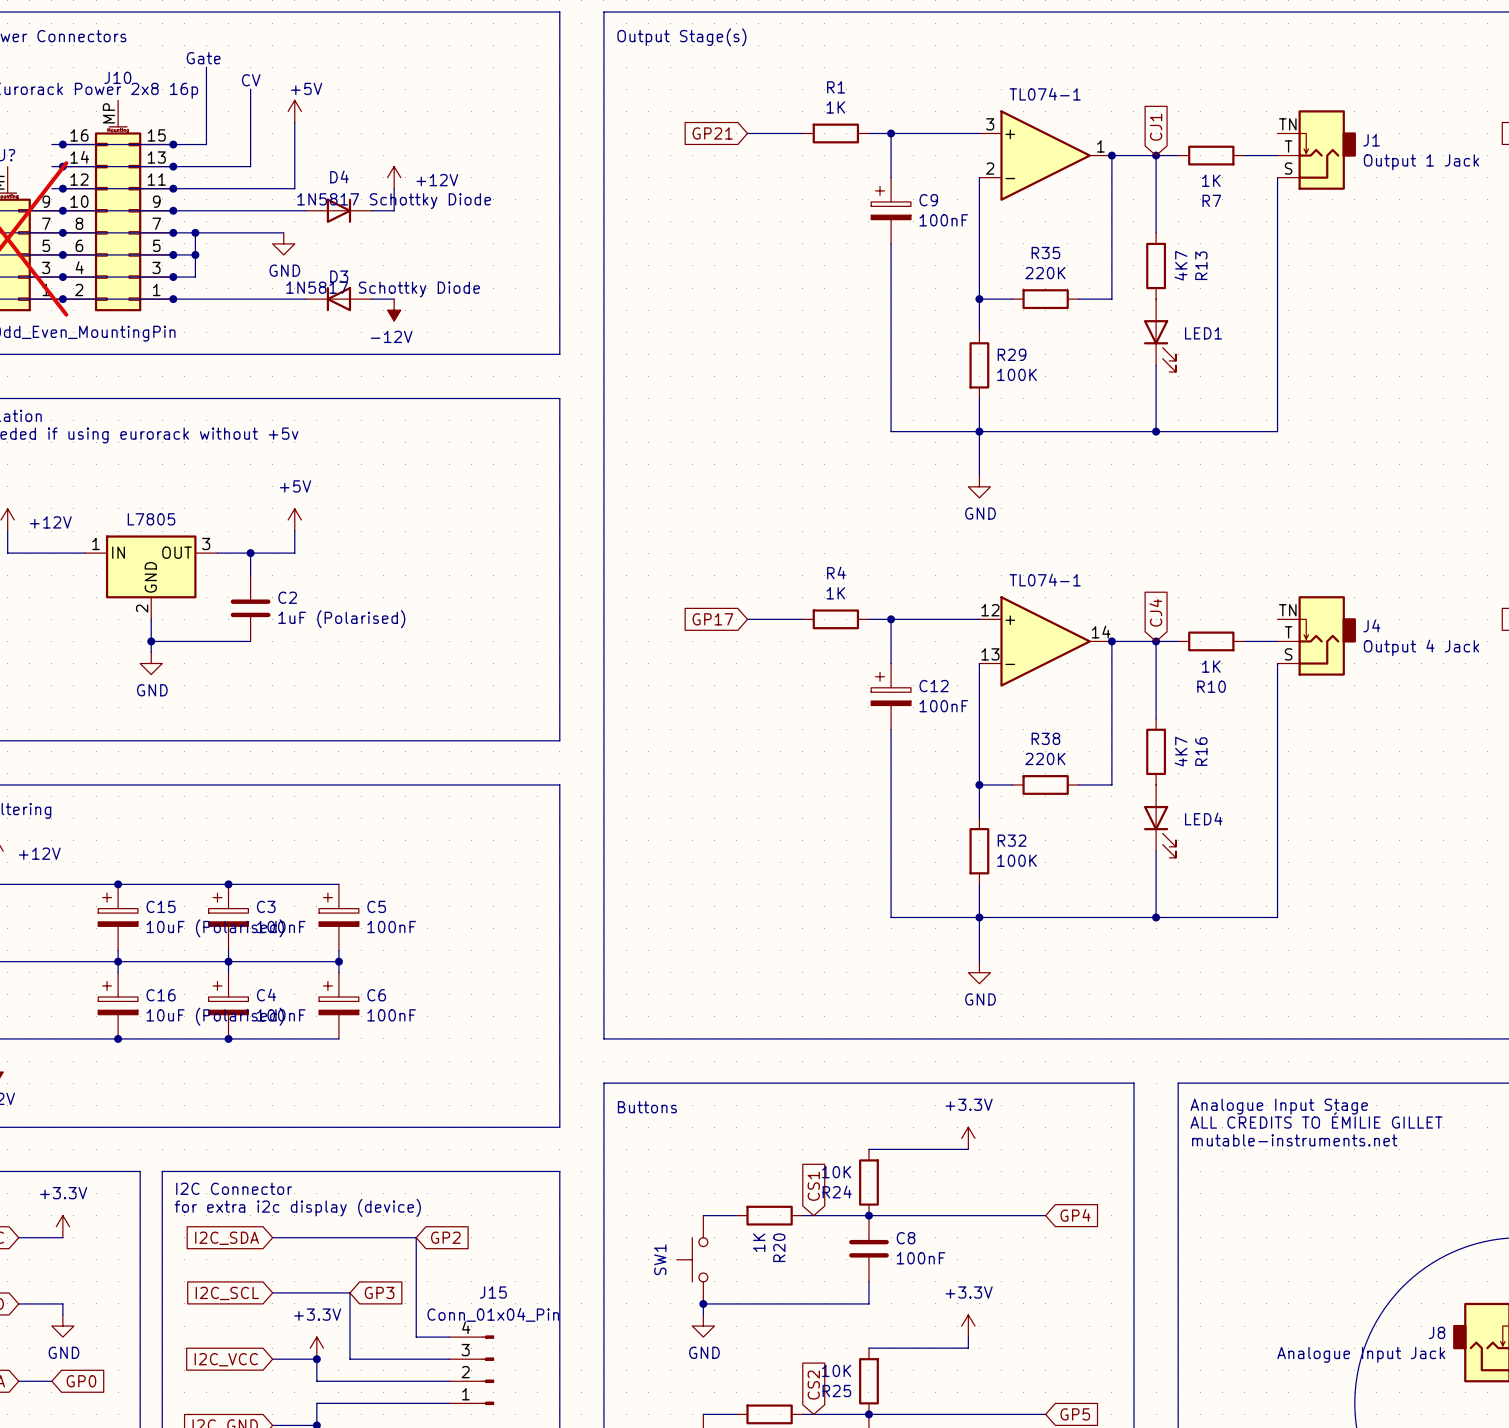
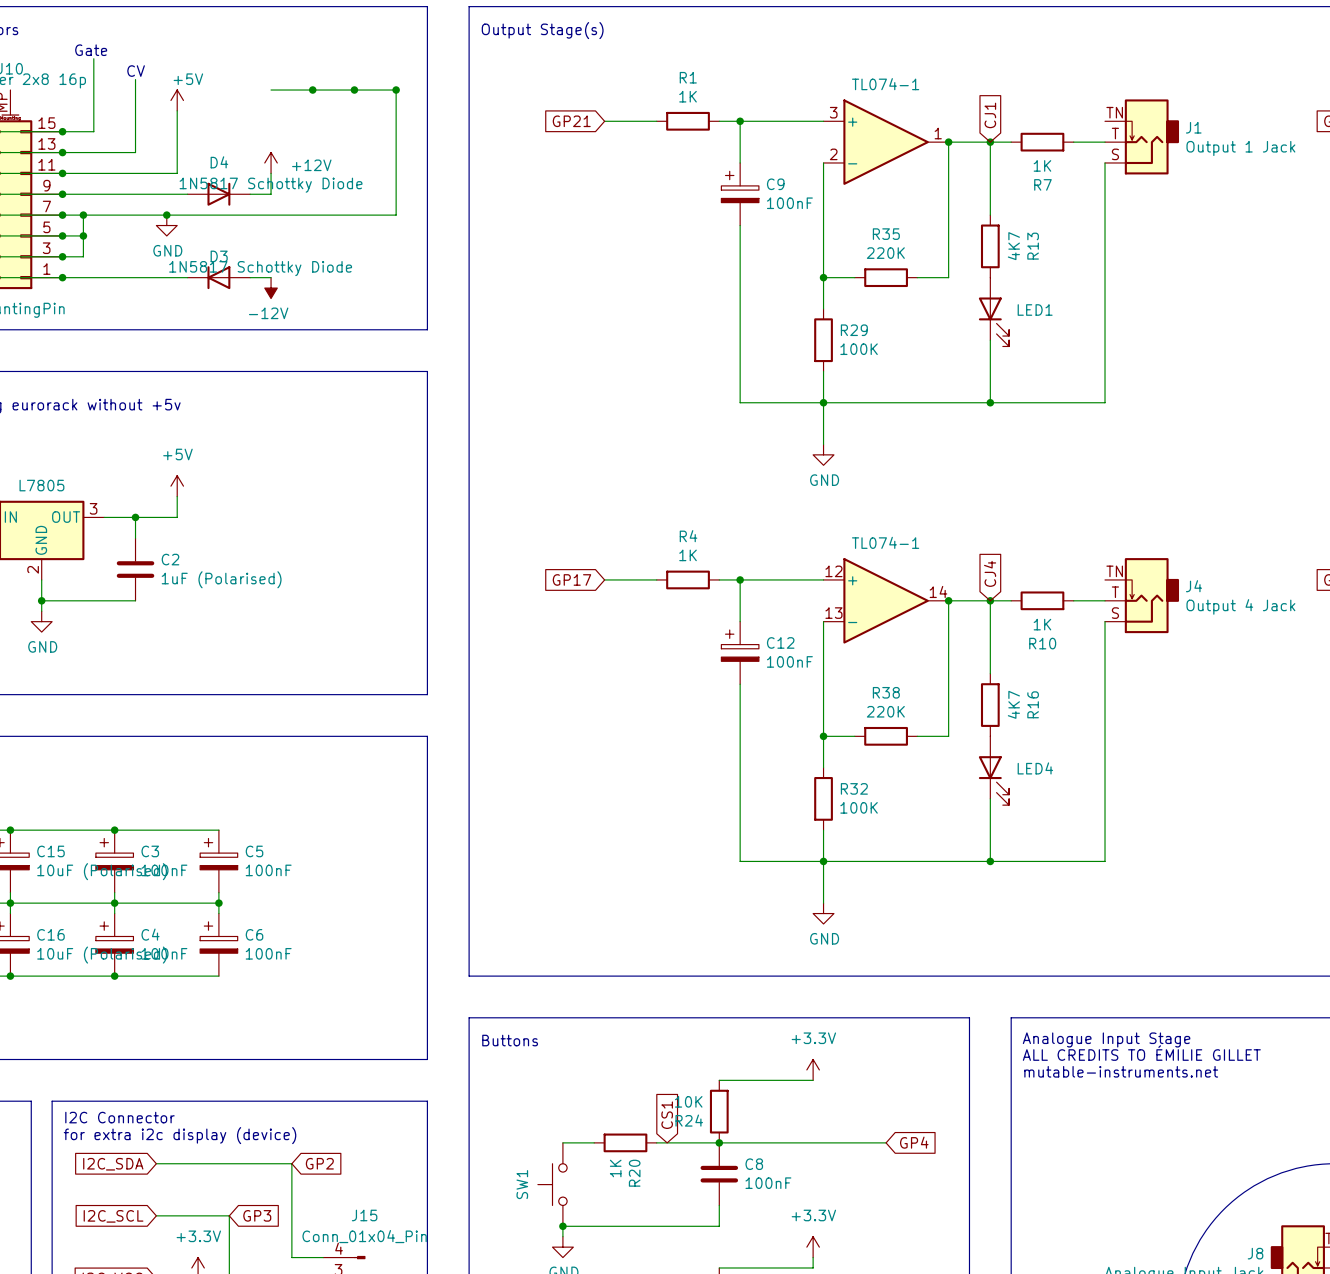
wire: none -> (271, 90) (396, 90) (396, 215) (166, 215)
junction: none -> (312, 90)
junction: none -> (354, 90)
junction: none -> (396, 90)
junction: none -> (166, 215)

